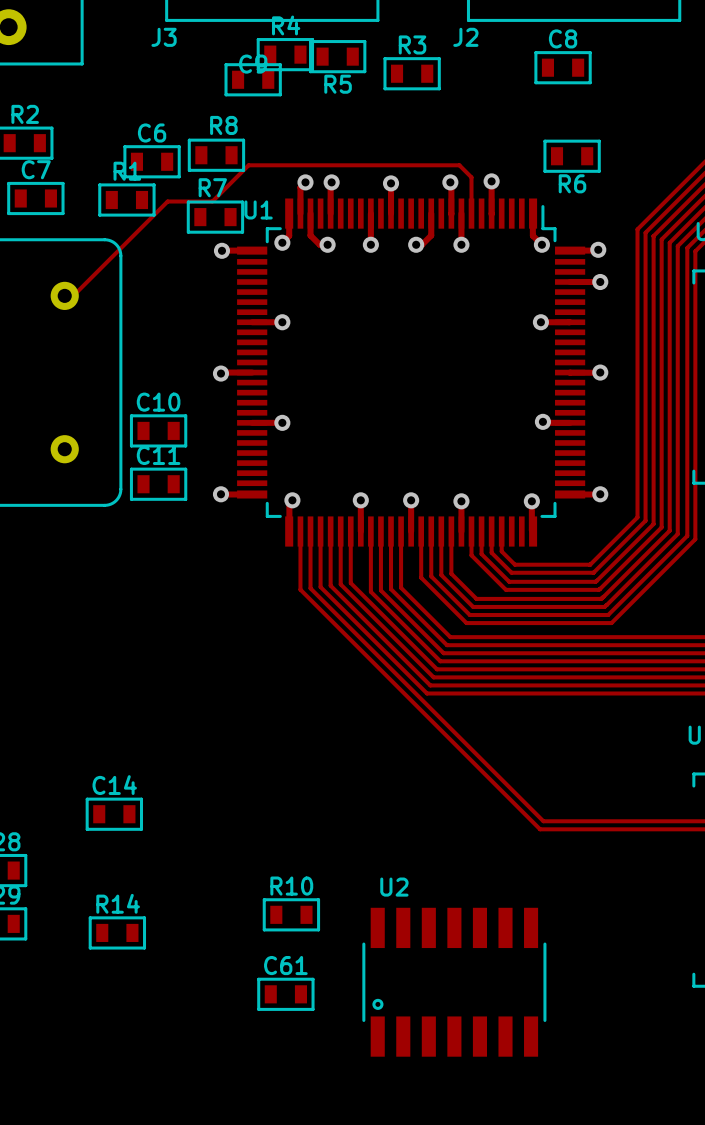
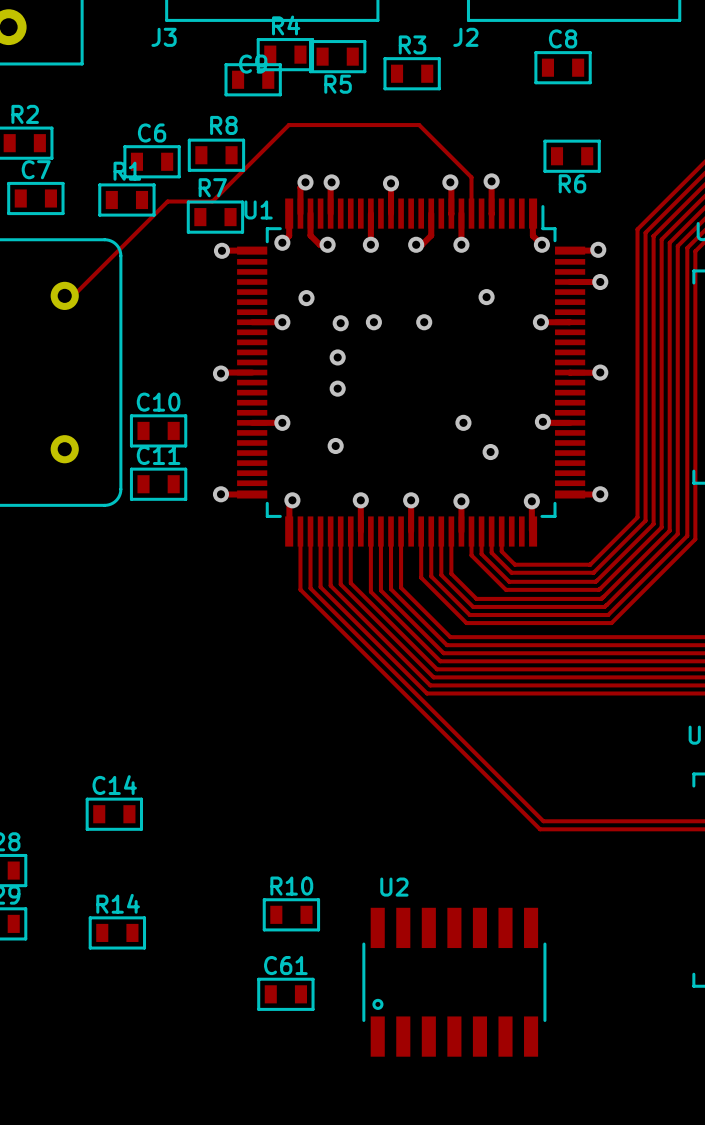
track: (248, 165) (459, 165) -> (248, 165) (288, 125) (419, 125) (459, 165)
via: none -> (486, 297)
via: none -> (306, 298)
via: none -> (373, 322)
via: none -> (424, 322)
via: none -> (340, 323)
via: none -> (337, 357)
via: none -> (337, 388)
via: none -> (463, 422)
via: none -> (335, 445)
via: none -> (490, 452)

